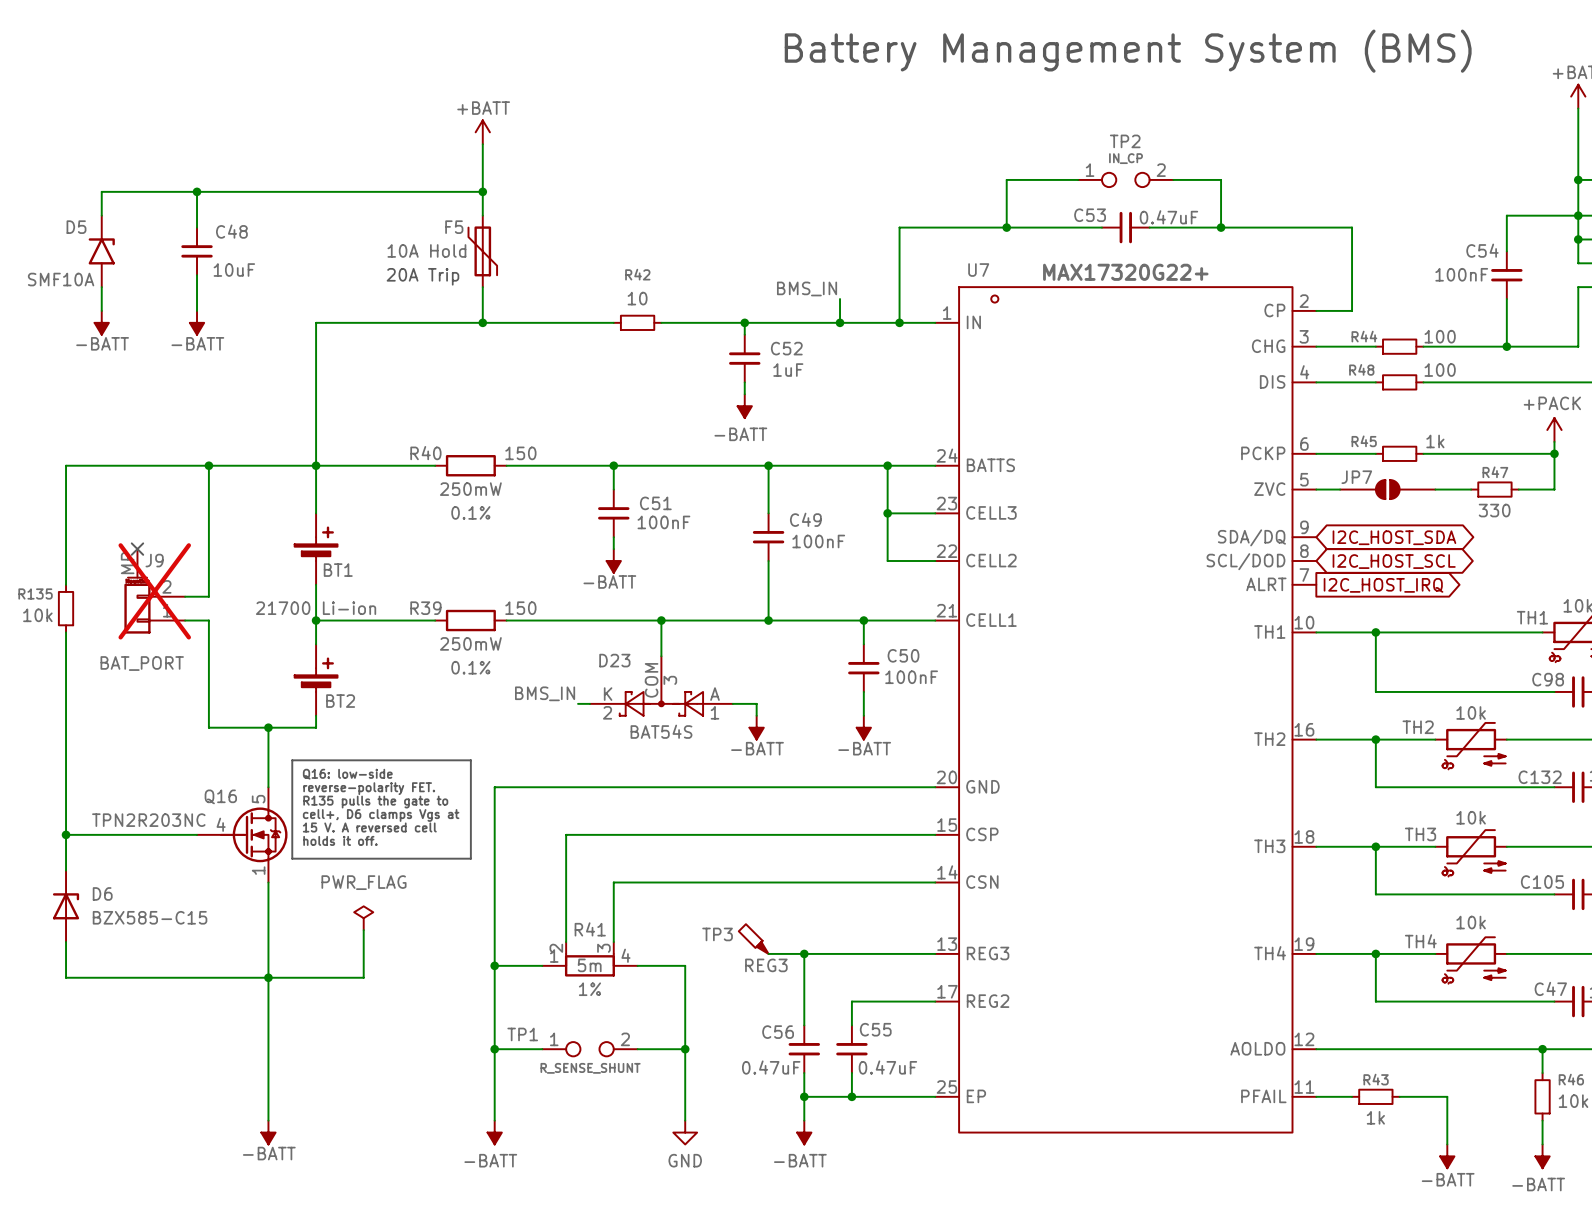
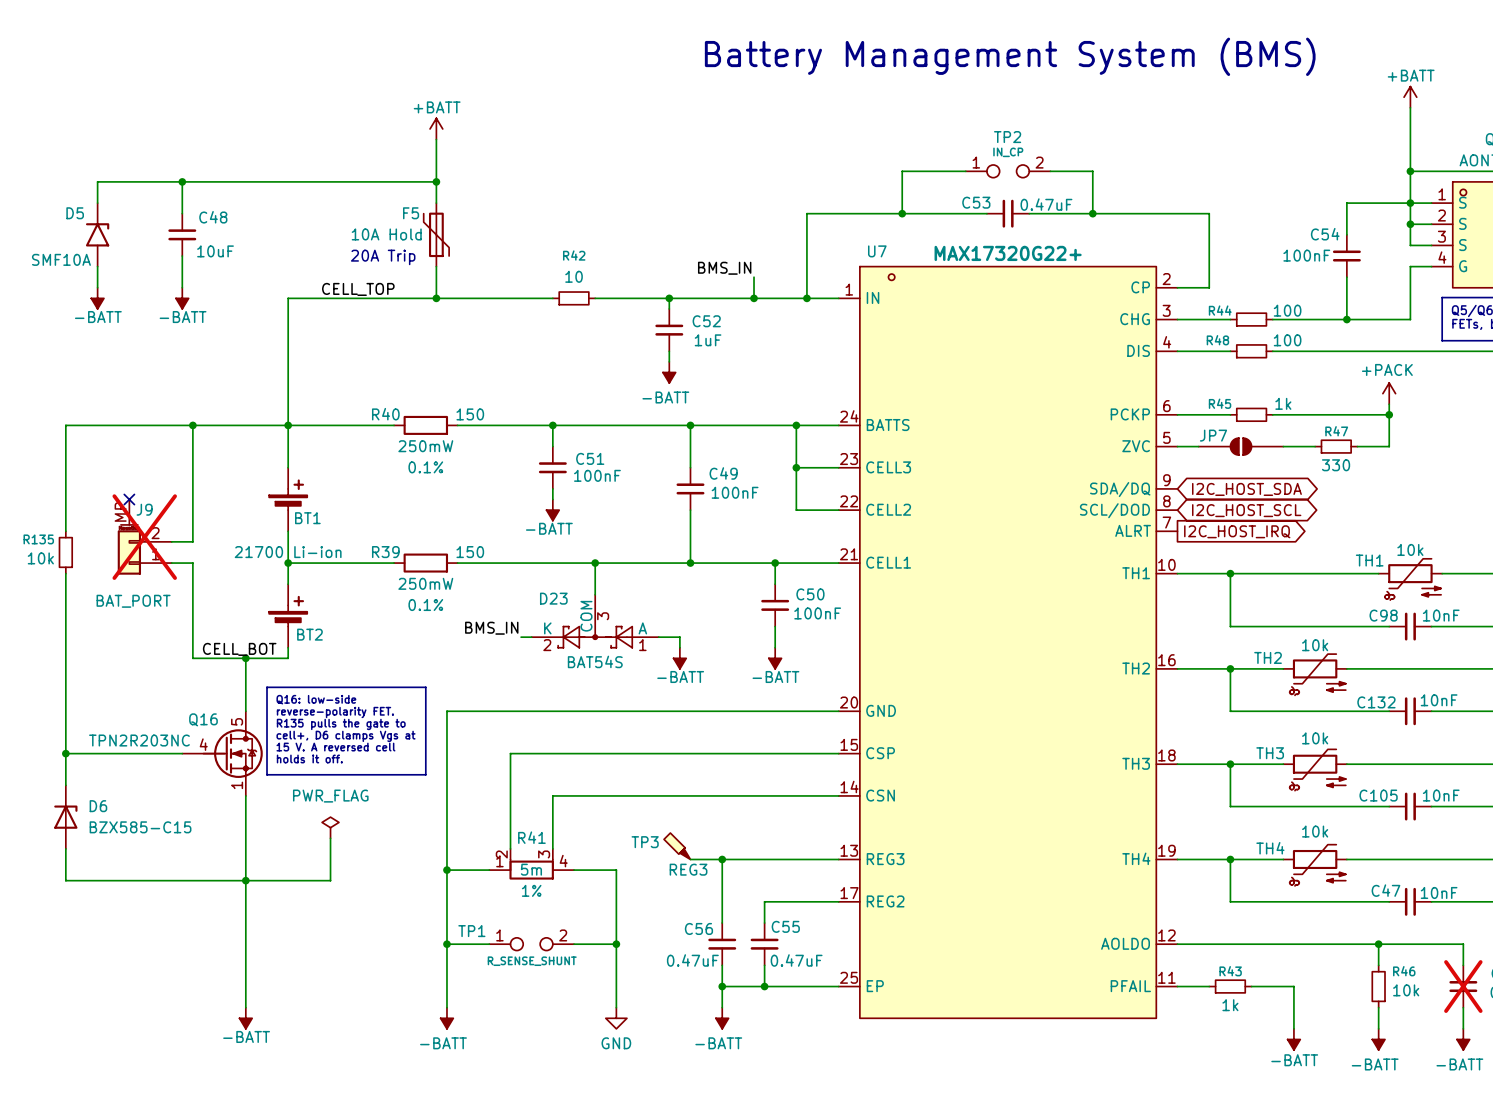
label: none -> CELL_TOP (358, 289)
label: none -> CELL_BOT (239, 649)

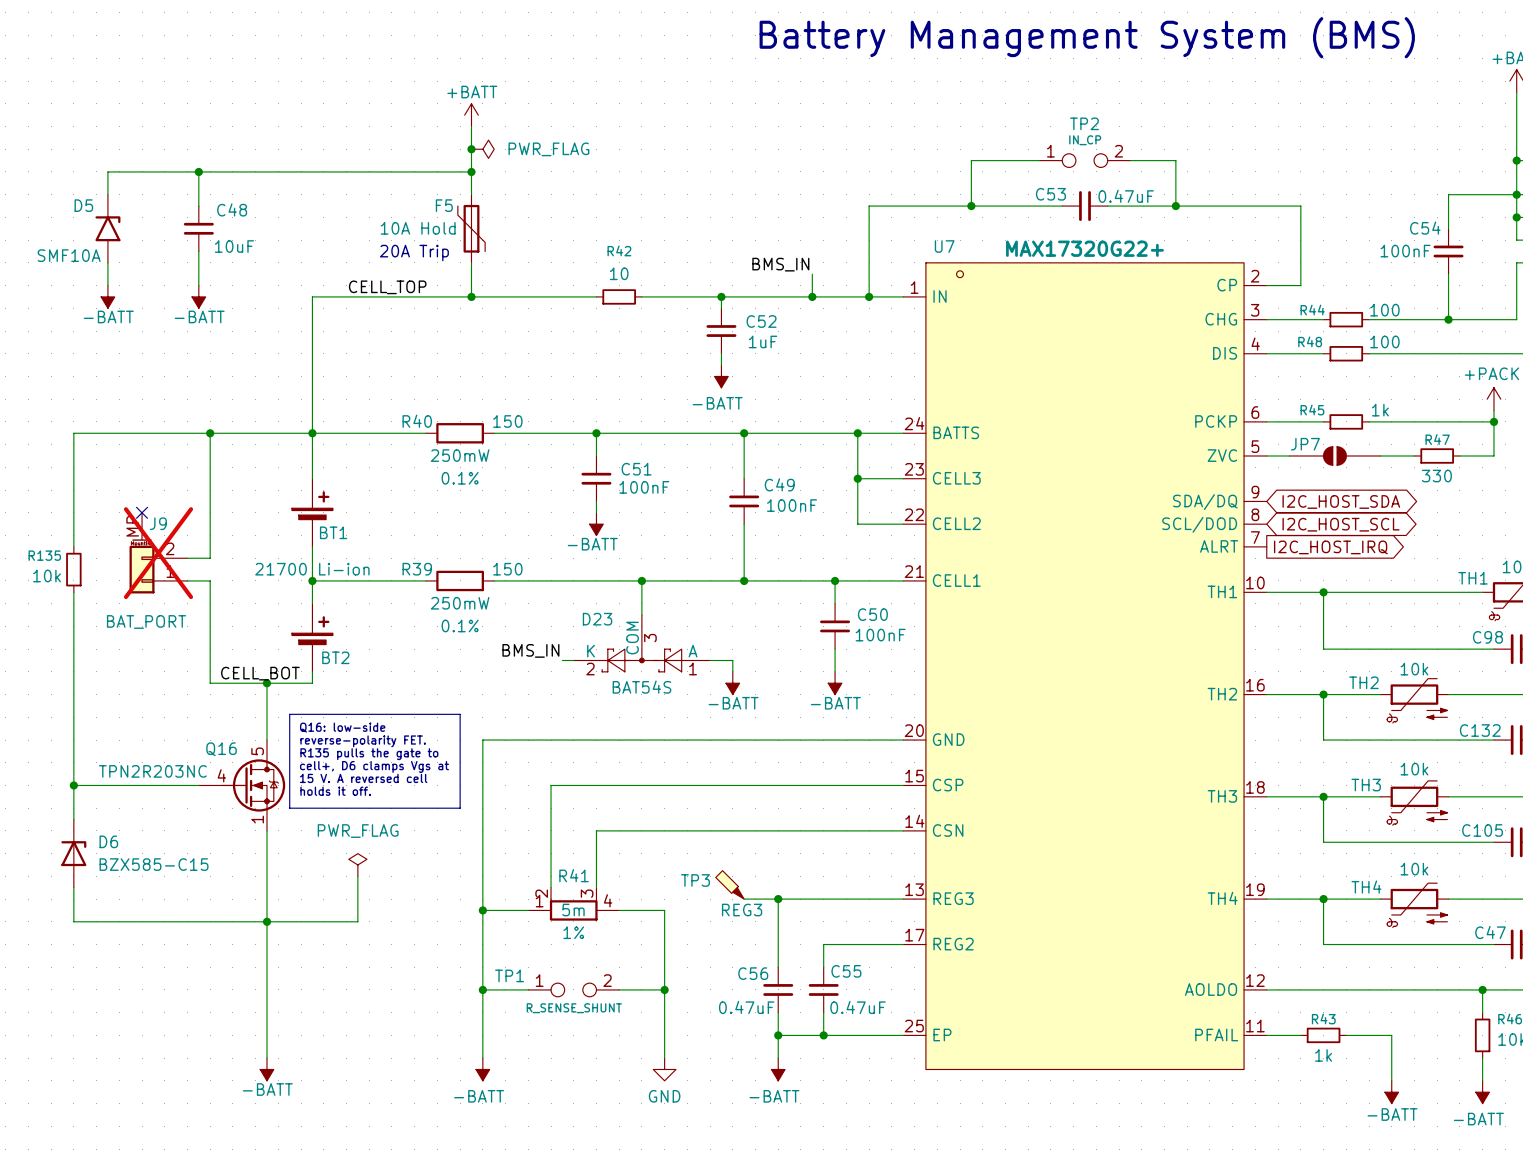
junction: none -> (471, 149)
power symbol: none -> PWR_FLAG (482, 149)

